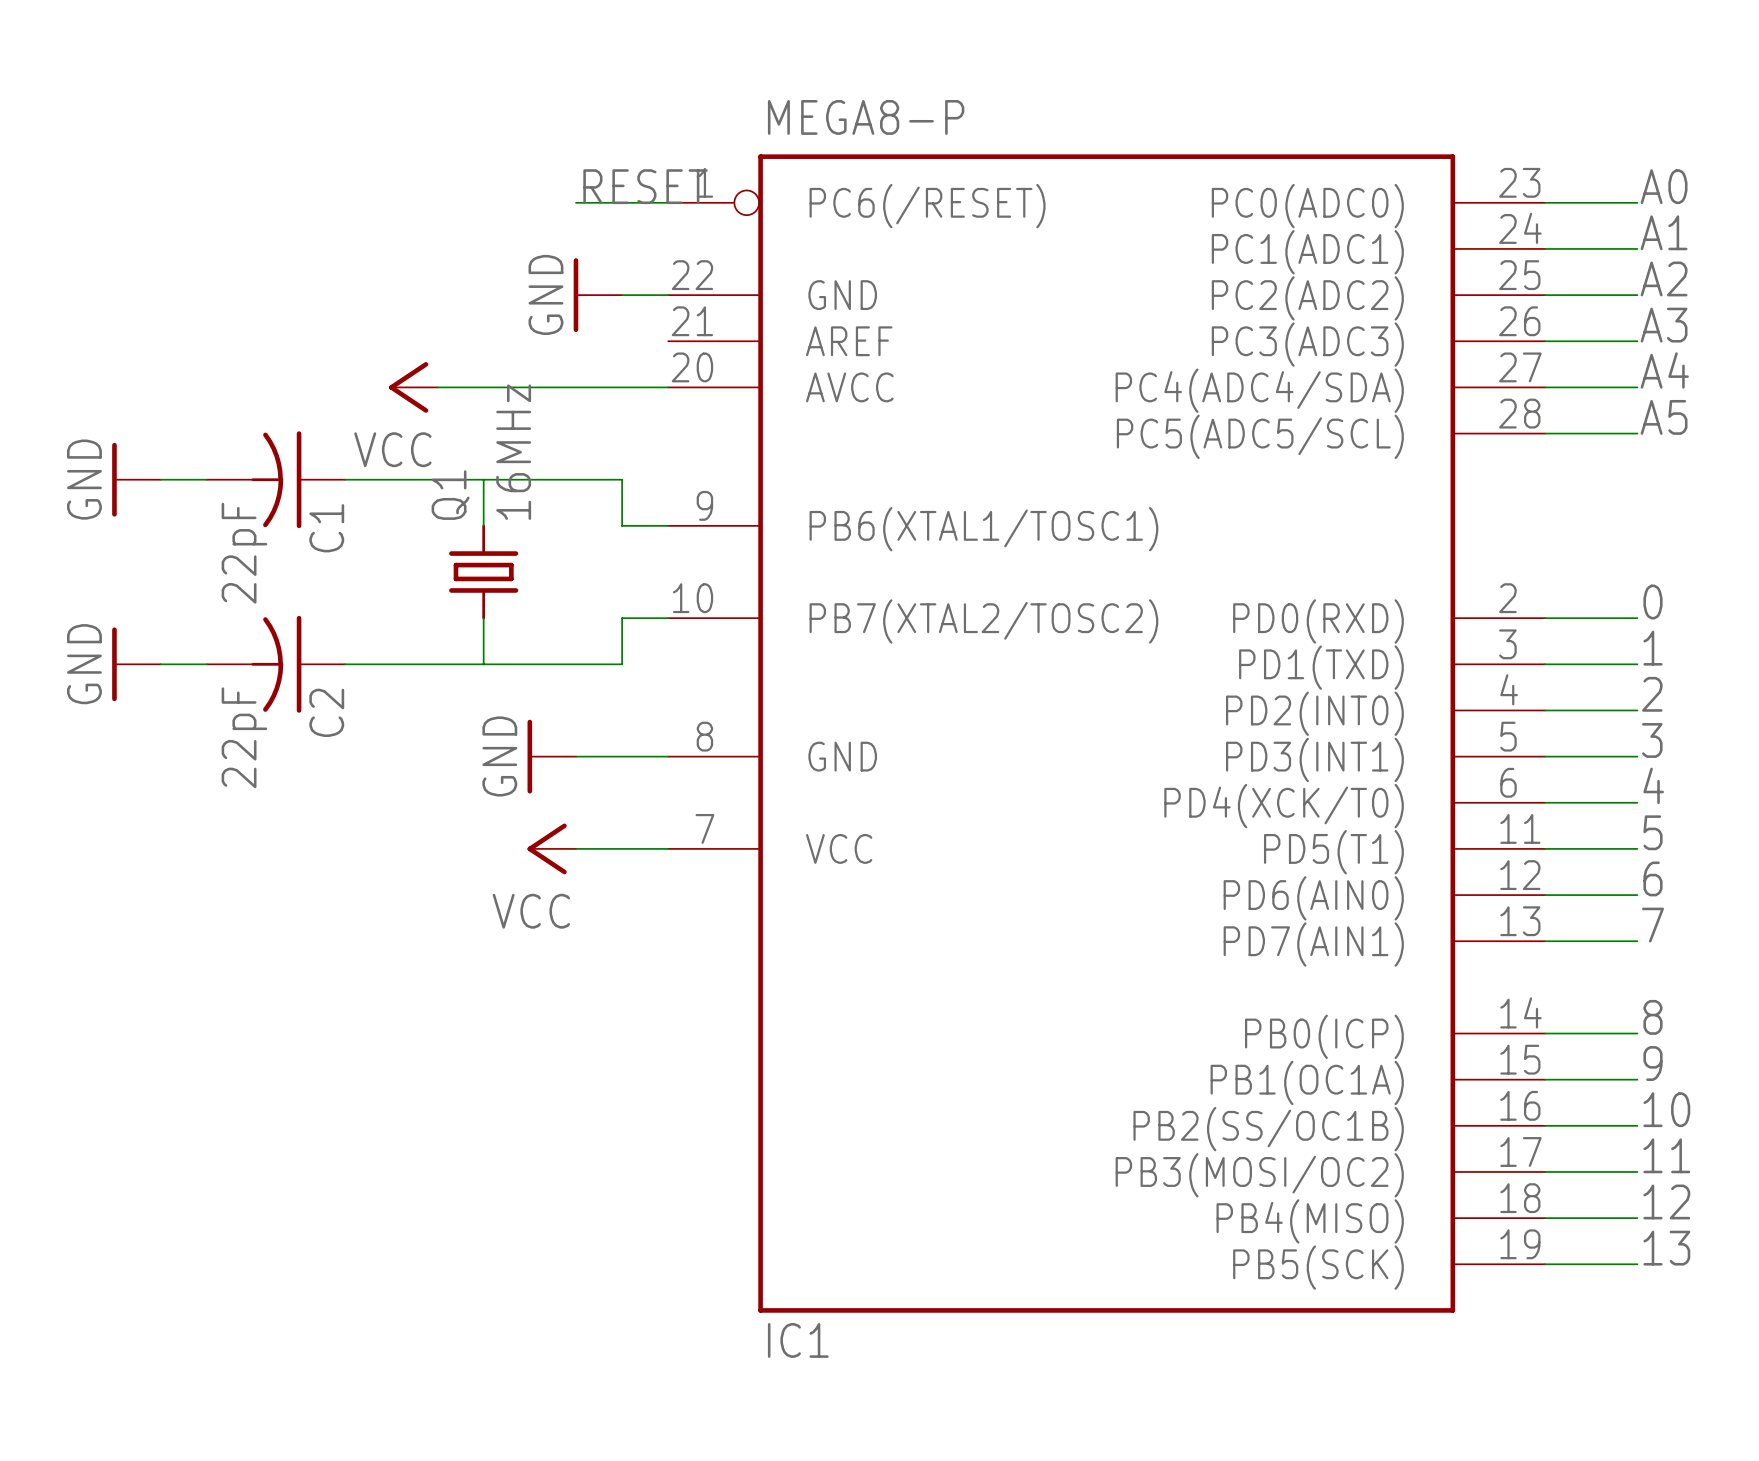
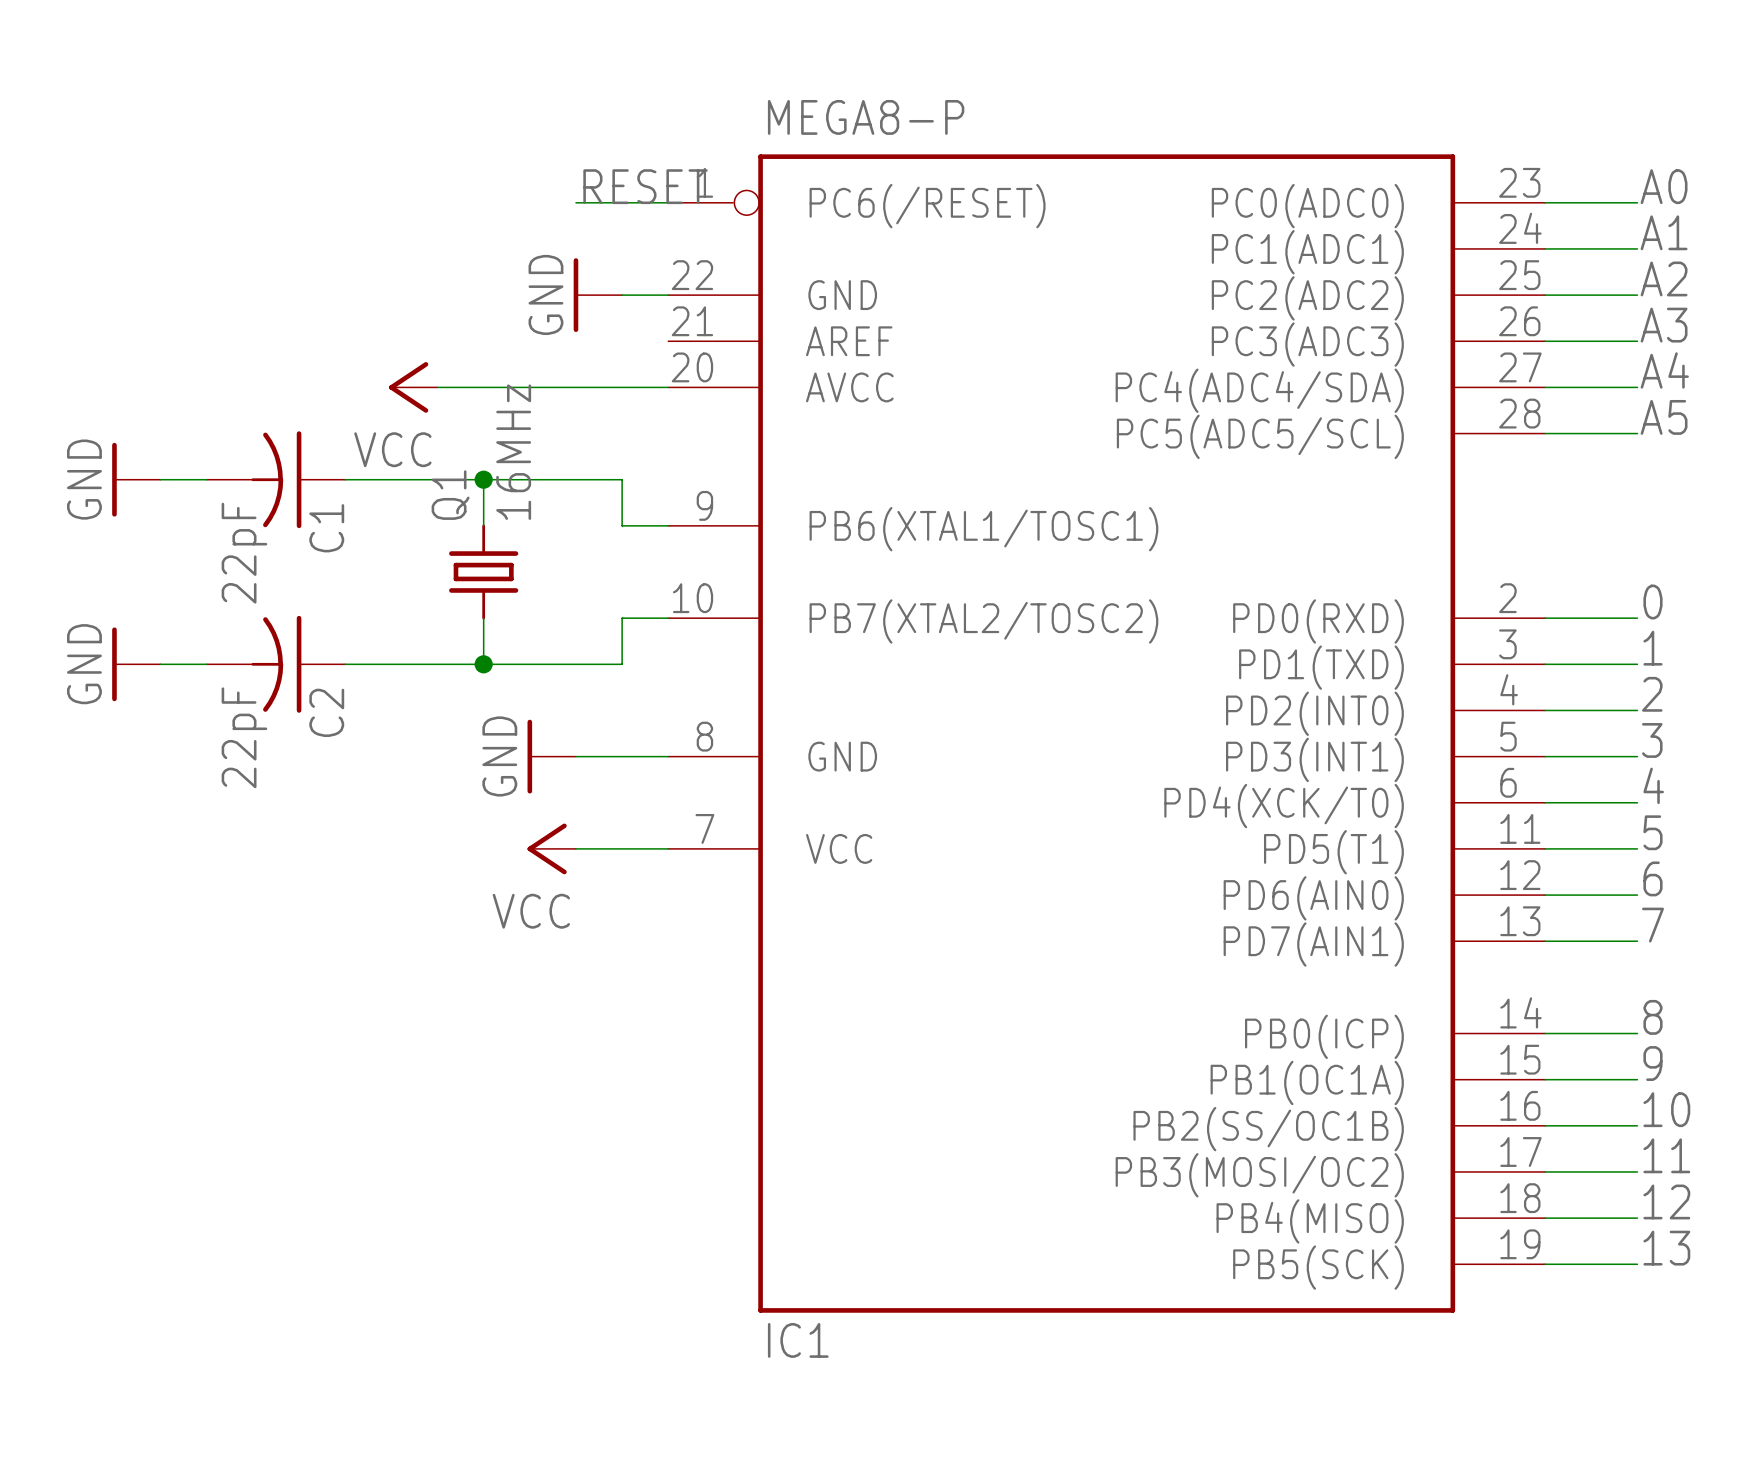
junction: none -> (483, 479)
junction: none -> (483, 664)

